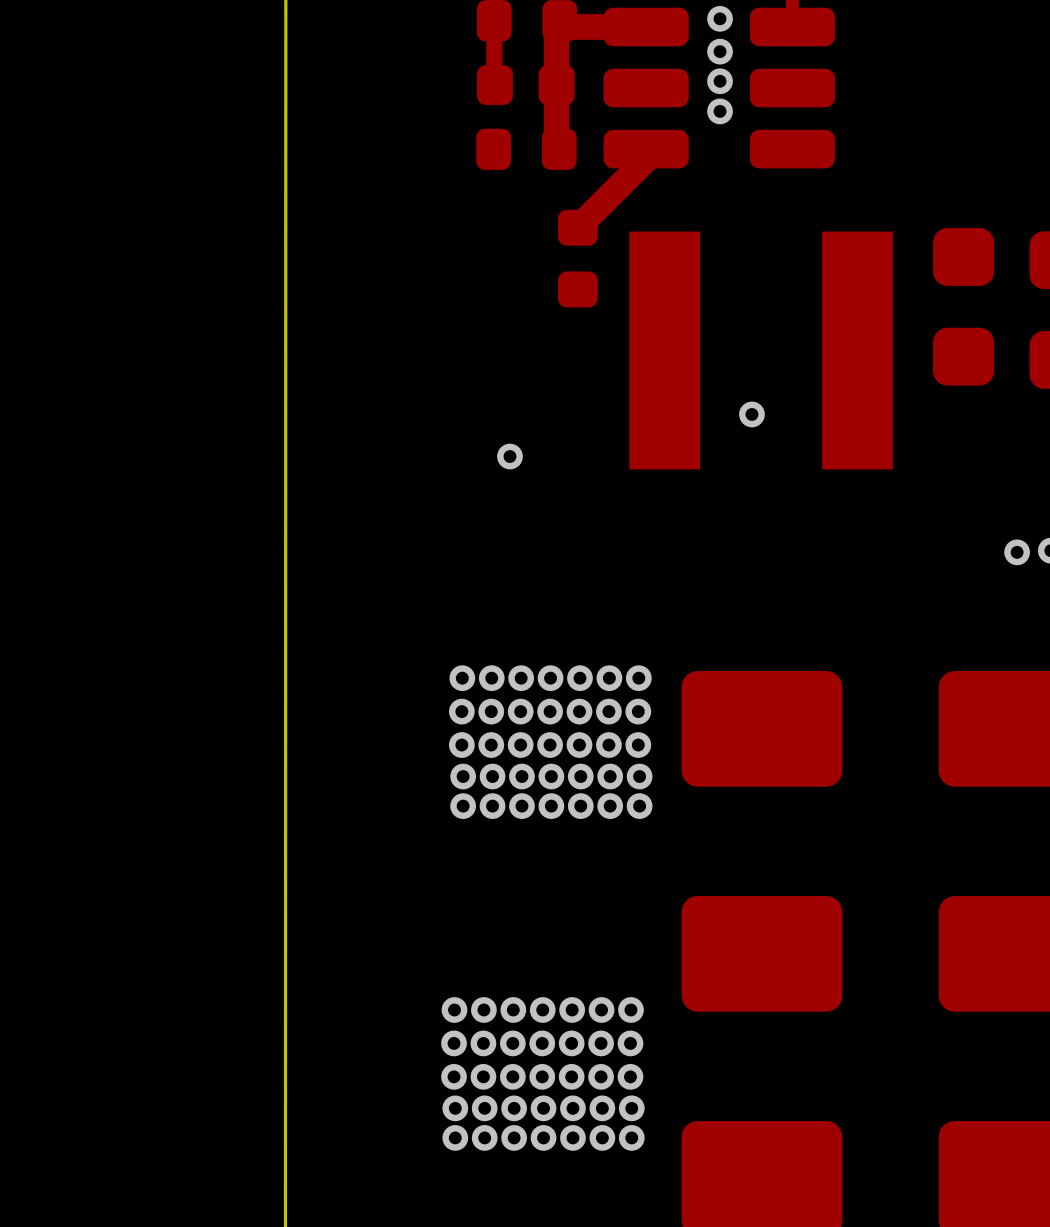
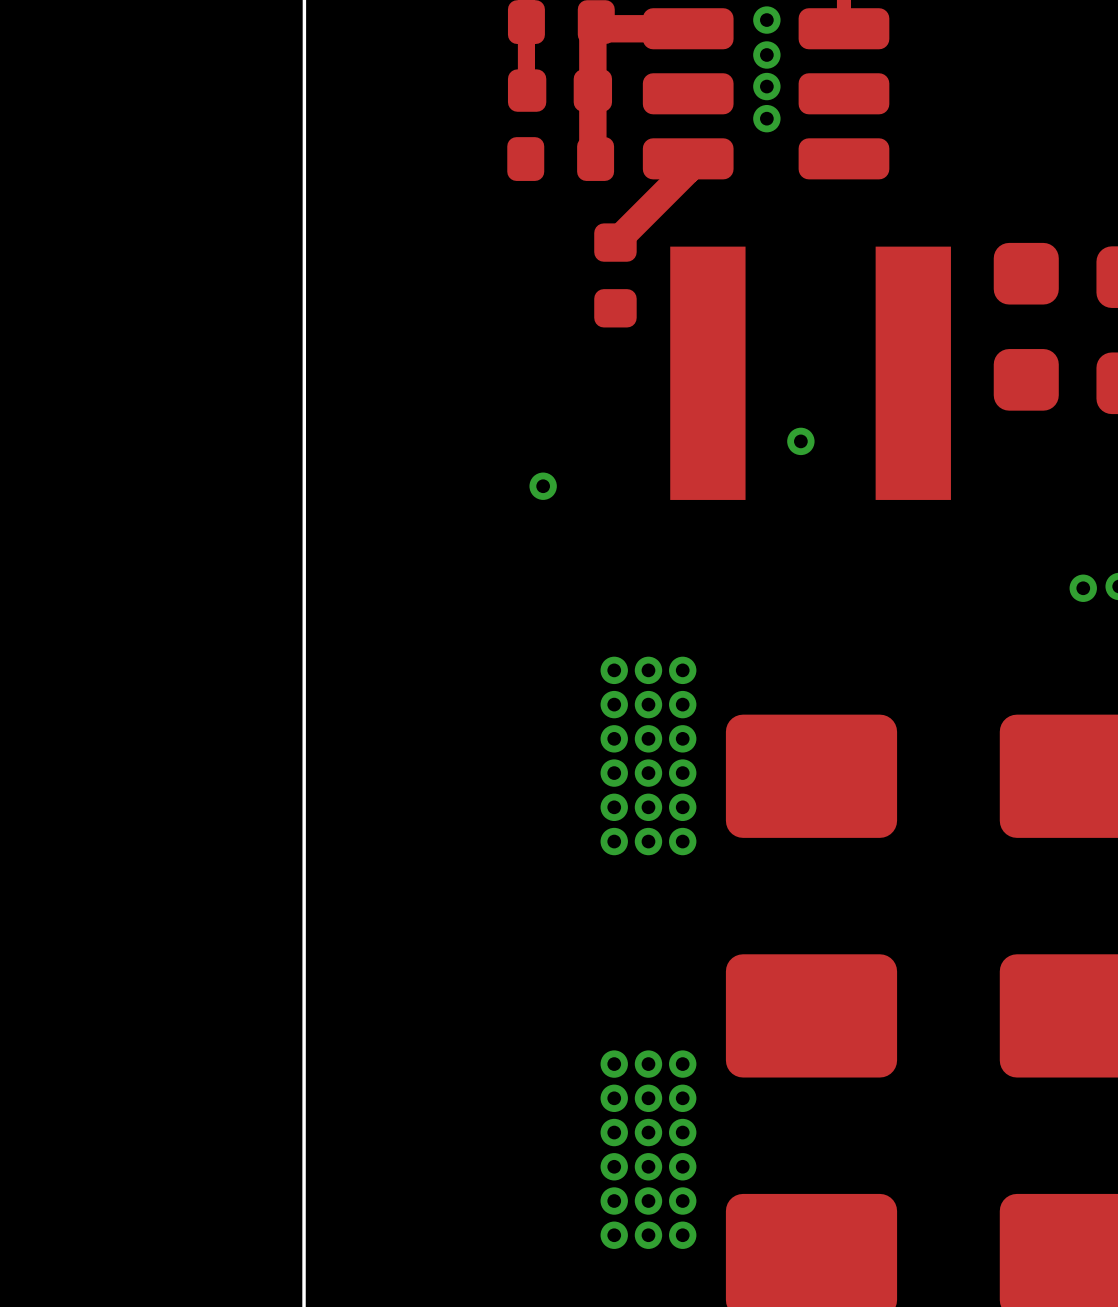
via: none -> (614, 670)
via: none -> (648, 670)
via: none -> (682, 670)
via: none -> (614, 704)
via: none -> (648, 704)
via: none -> (682, 704)
via: (462, 678) -> none
via: (491, 678) -> none
via: (521, 678) -> none
via: (550, 678) -> none
via: (579, 678) -> none
via: (609, 678) -> none
via: (638, 678) -> none
via: none -> (614, 738)
via: none -> (648, 738)
via: none -> (682, 738)
via: (461, 711) -> none
via: (491, 711) -> none
via: (520, 711) -> none
via: (550, 711) -> none
via: (579, 711) -> none
via: (608, 711) -> none
via: (638, 711) -> none
via: none -> (614, 773)
via: none -> (648, 773)
via: none -> (682, 773)
via: (461, 745) -> none
via: (491, 745) -> none
via: (520, 745) -> none
via: (550, 745) -> none
via: (579, 745) -> none
via: (608, 745) -> none
via: (638, 745) -> none
via: none -> (614, 807)
via: none -> (648, 807)
via: none -> (682, 807)
via: (463, 776) -> none
via: (492, 776) -> none
via: (521, 776) -> none
via: (551, 776) -> none
via: (580, 776) -> none
via: (610, 776) -> none
via: (639, 776) -> none
via: none -> (614, 841)
via: none -> (648, 841)
via: none -> (682, 841)
via: (463, 806) -> none
via: (492, 806) -> none
via: (521, 806) -> none
via: (551, 806) -> none
via: (580, 806) -> none
via: (610, 806) -> none
via: (639, 806) -> none
via: none -> (614, 1064)
via: none -> (648, 1064)
via: none -> (682, 1064)
via: (454, 1009) -> none
via: (483, 1009) -> none
via: (513, 1009) -> none
via: (542, 1009) -> none
via: (572, 1009) -> none
via: (601, 1009) -> none
via: (630, 1009) -> none
via: none -> (614, 1098)
via: none -> (648, 1098)
via: none -> (682, 1098)
via: (454, 1043) -> none
via: (483, 1043) -> none
via: (512, 1043) -> none
via: (542, 1043) -> none
via: (571, 1043) -> none
via: (601, 1043) -> none
via: (630, 1043) -> none
via: none -> (614, 1132)
via: none -> (648, 1132)
via: none -> (682, 1132)
via: (454, 1076) -> none
via: (483, 1076) -> none
via: (512, 1076) -> none
via: (542, 1076) -> none
via: (571, 1076) -> none
via: (601, 1076) -> none
via: (630, 1076) -> none
via: none -> (614, 1166)
via: none -> (648, 1166)
via: none -> (682, 1166)
via: (455, 1108) -> none
via: (484, 1108) -> none
via: (514, 1108) -> none
via: (543, 1108) -> none
via: (572, 1108) -> none
via: (602, 1108) -> none
via: (631, 1108) -> none
via: none -> (614, 1201)
via: none -> (648, 1201)
via: none -> (682, 1201)
via: (455, 1137) -> none
via: (484, 1137) -> none
via: (514, 1137) -> none
via: (543, 1137) -> none
via: (572, 1137) -> none
via: (602, 1137) -> none
via: (631, 1137) -> none
via: none -> (614, 1235)
via: none -> (648, 1235)
via: none -> (682, 1235)

